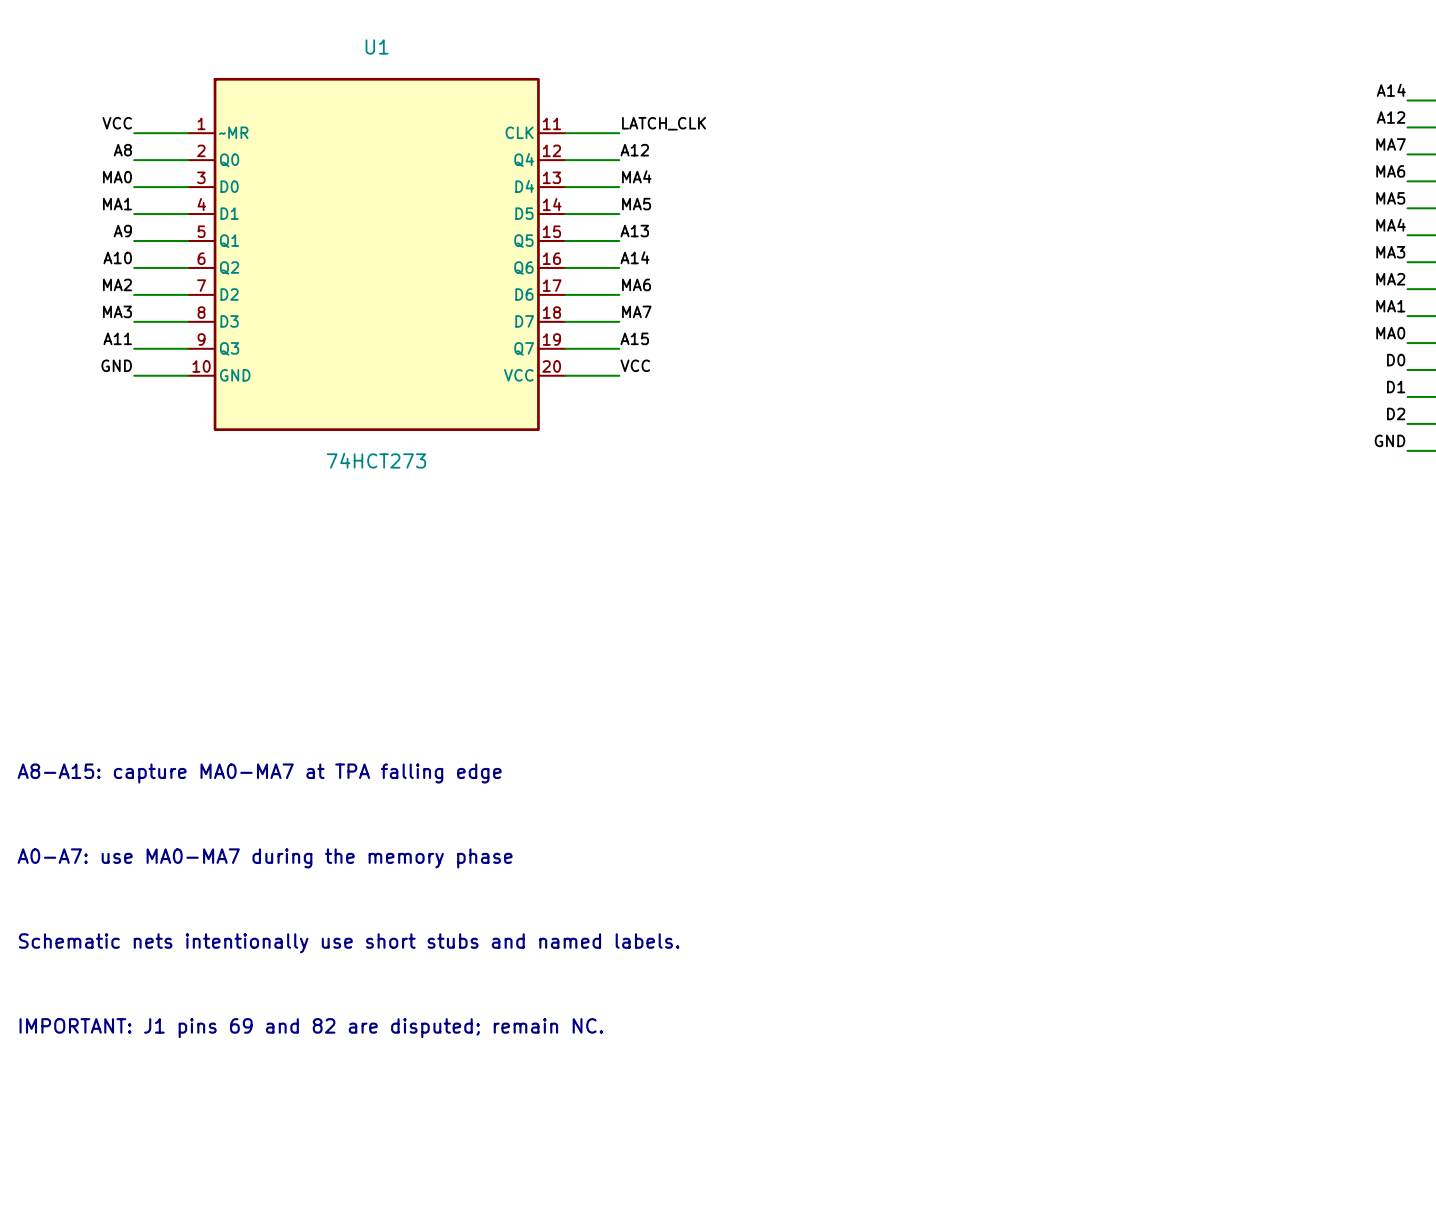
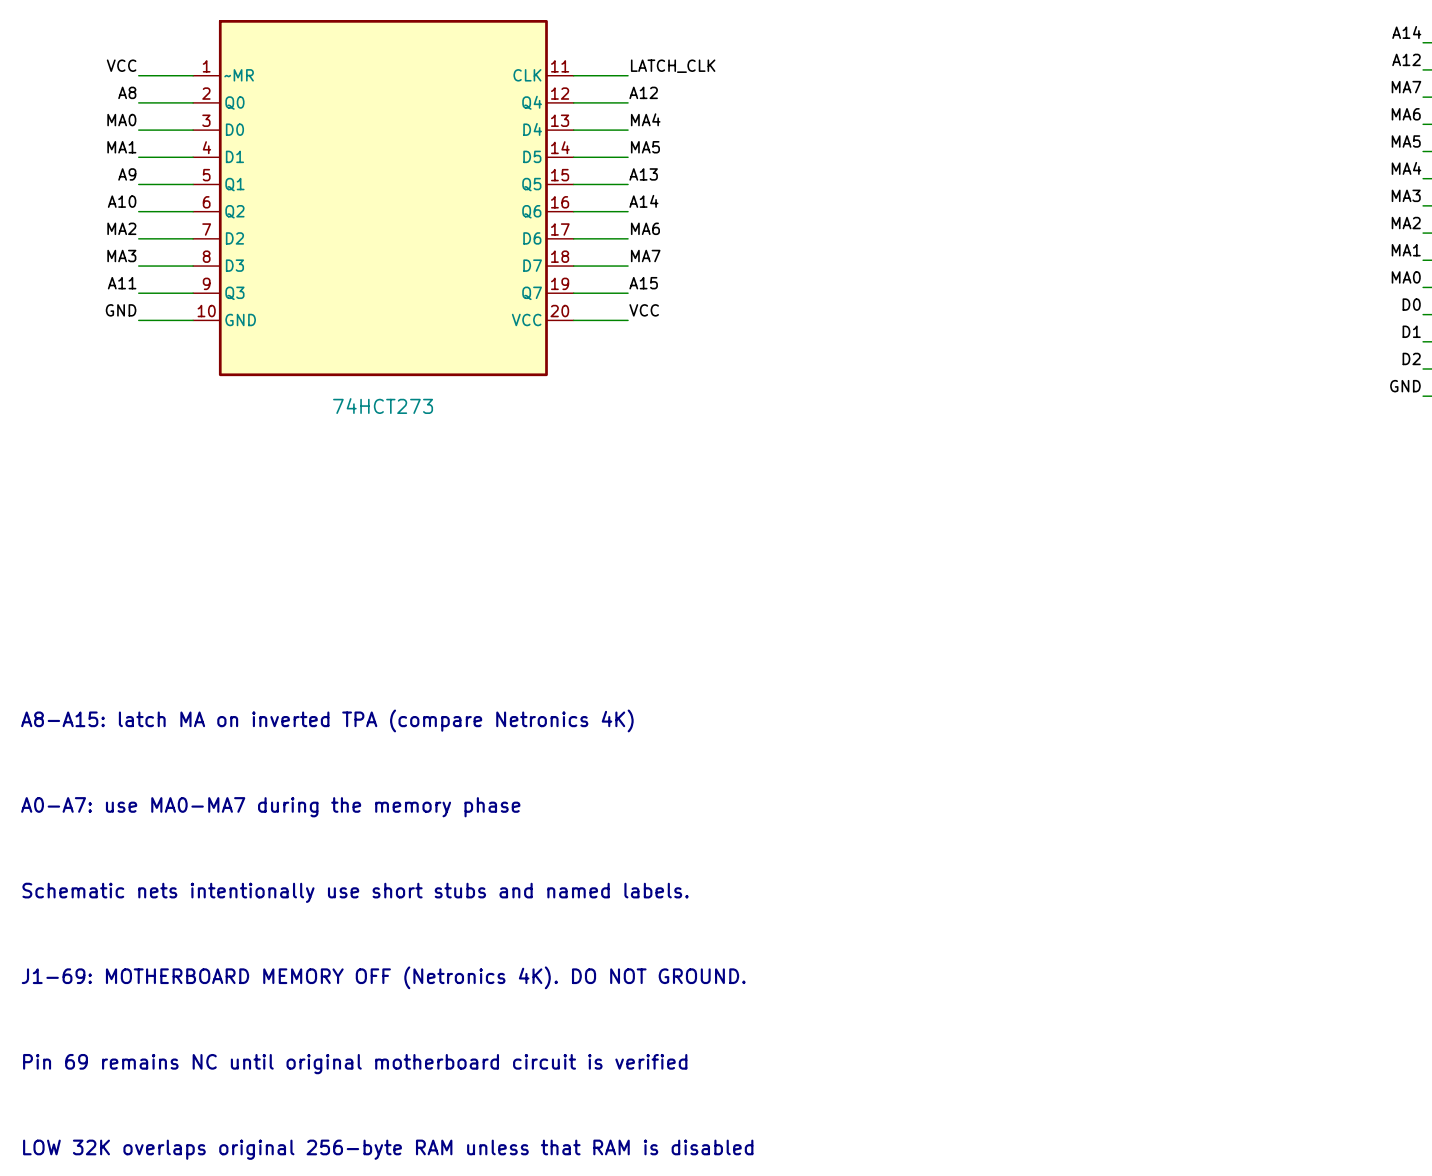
text: A8-A15: capture MA0-MA7 at TPA falling edge (259, 773) -> A8-A15: latch MA on inverted TPA (compare Netronics 4K) (327, 720)
text: IMPORTANT: J1 pins 69 and 82 are disputed; remain NC. (311, 1028) -> J1-69: MOTHERBOARD MEMORY OFF (Netronics 4K). DO NOT GROUND. (383, 977)
text: none -> Pin 69 remains NC until original motherboard circuit is verified (355, 1064)
text: none -> LOW 32K overlaps original 256-byte RAM unless that RAM is disabled (388, 1149)

